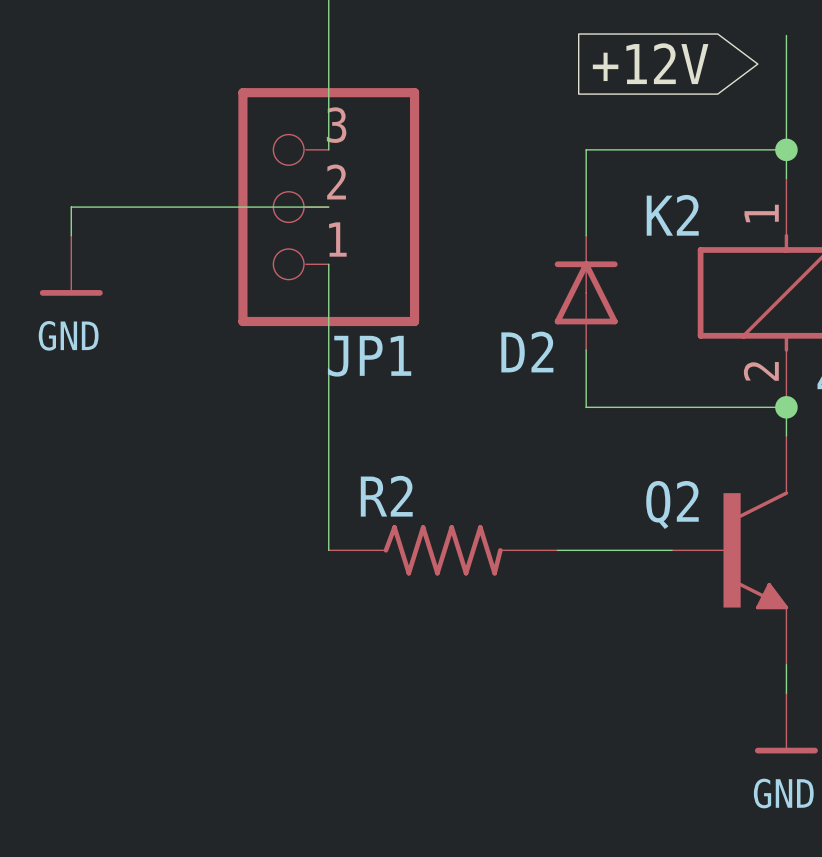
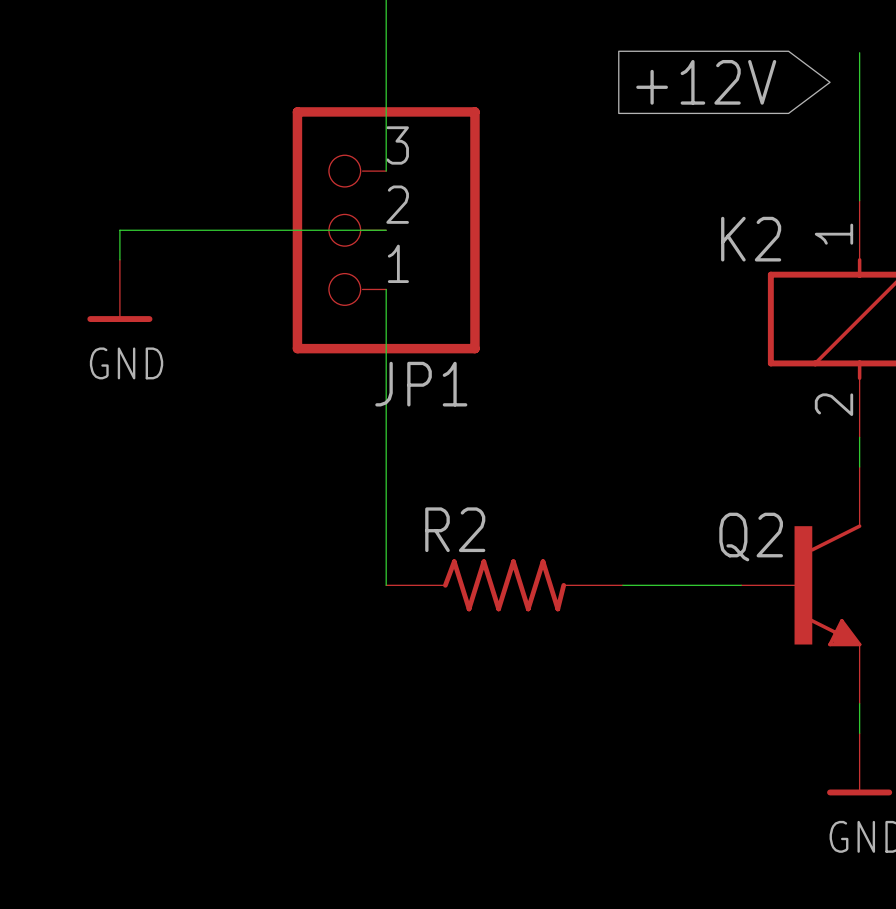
wire: (786, 149) (586, 149) (586, 235) -> none
junction: (786, 149) -> none
D2: (586, 292) -> none
wire: (586, 350) (586, 407) (786, 407) -> none
junction: (786, 407) -> none

